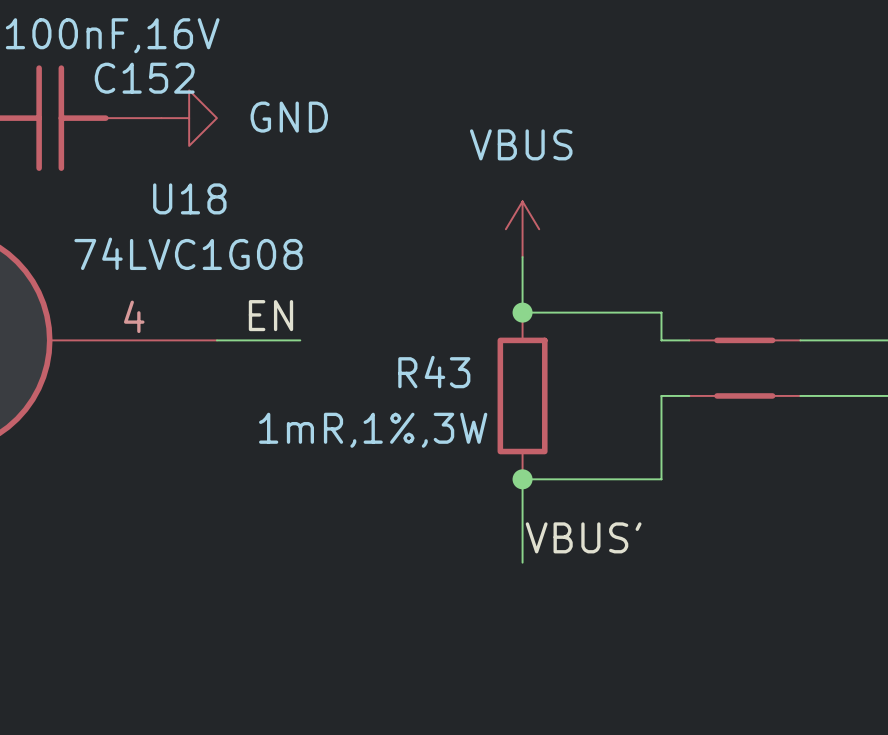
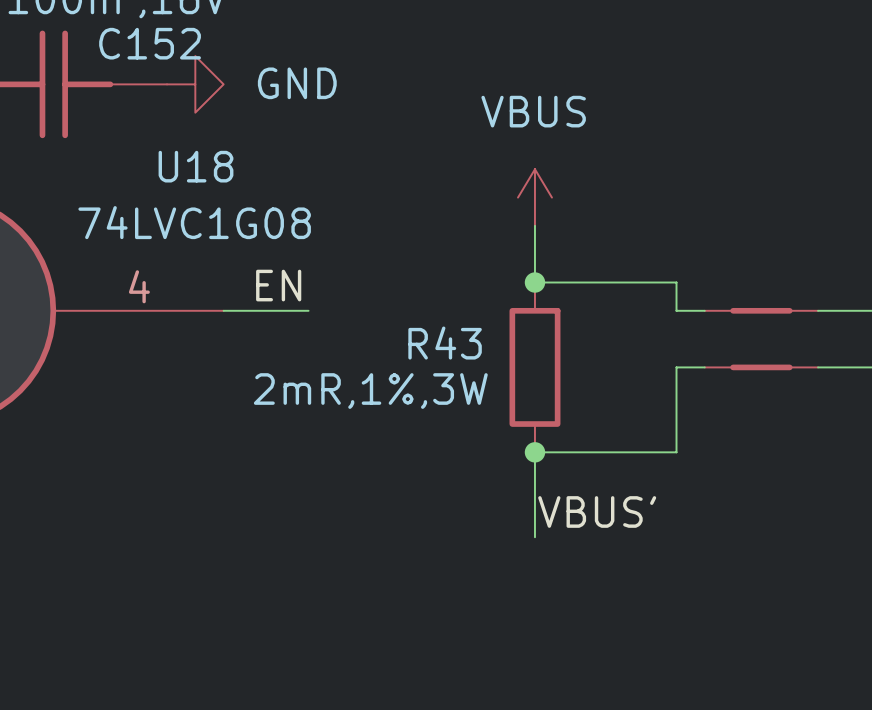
R43 value: 1mR,1%,3W (373, 430) -> 2mR,1%,3W (370, 391)

